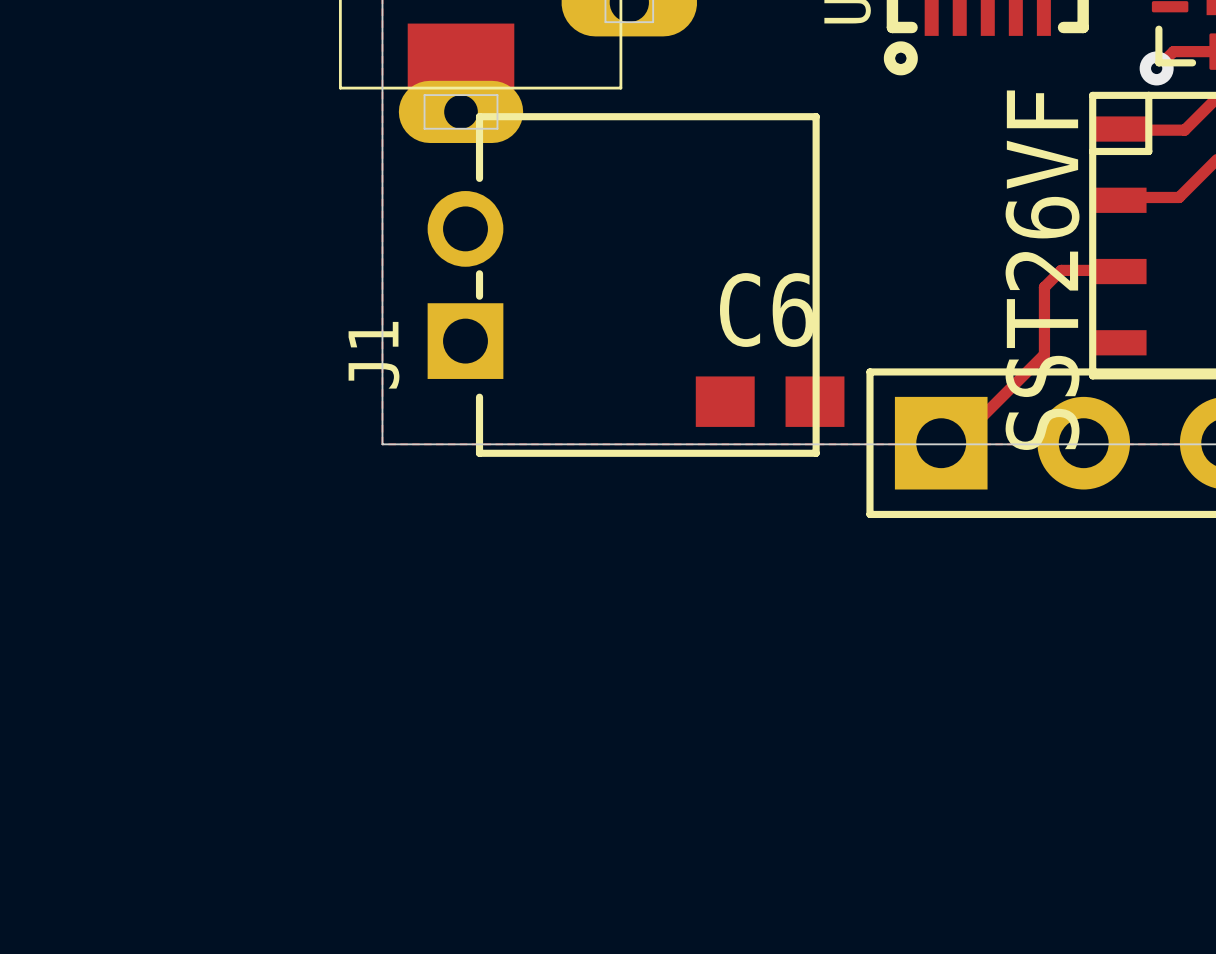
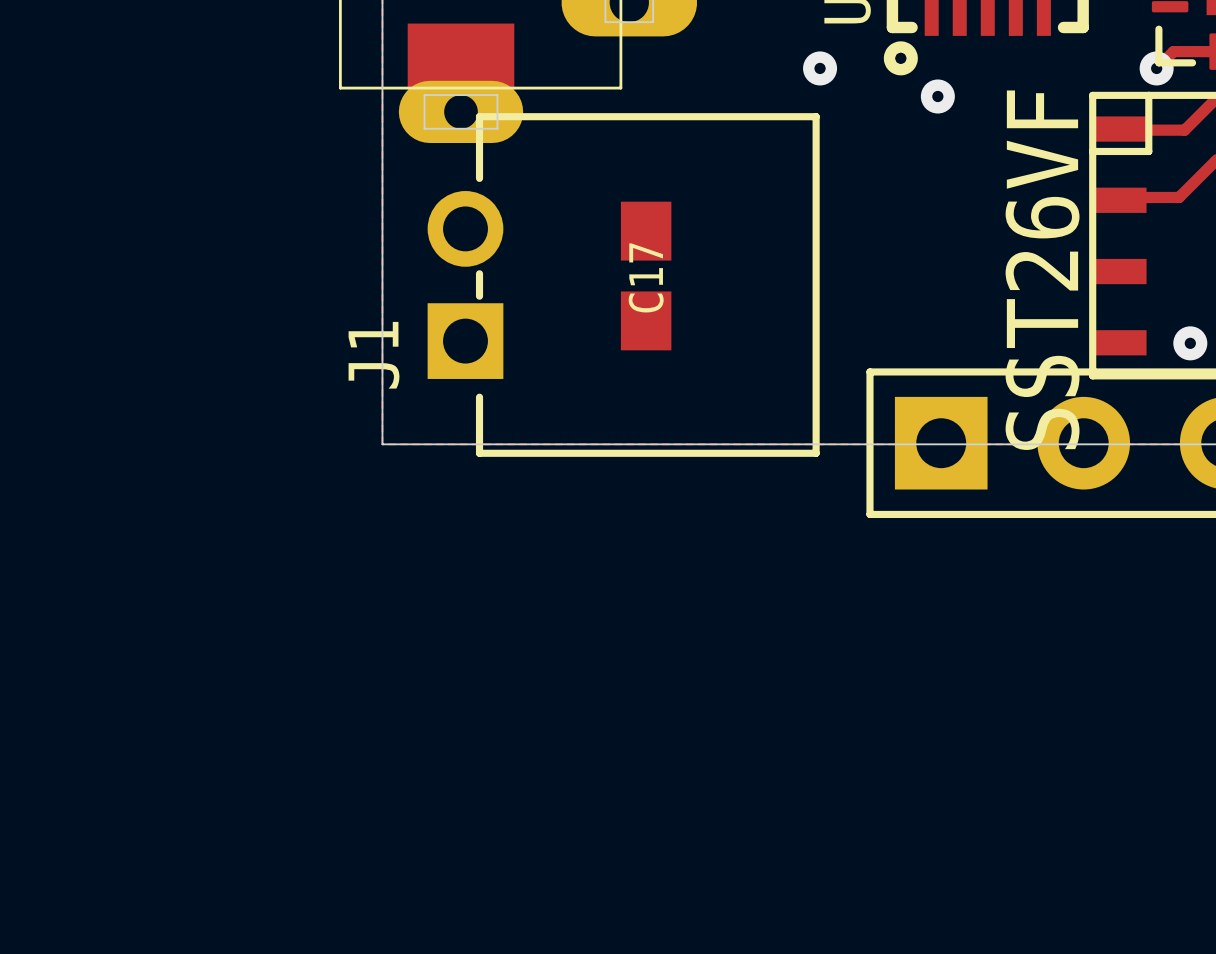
via: none -> (820, 68)
via: none -> (937, 96)
track: (1118, 271) (1061, 270) (1044, 287) (1044, 354) (955, 443) (941, 443) -> none
C17: none -> (646, 276)
via: none -> (1190, 343)
C6: (770, 401) -> none

